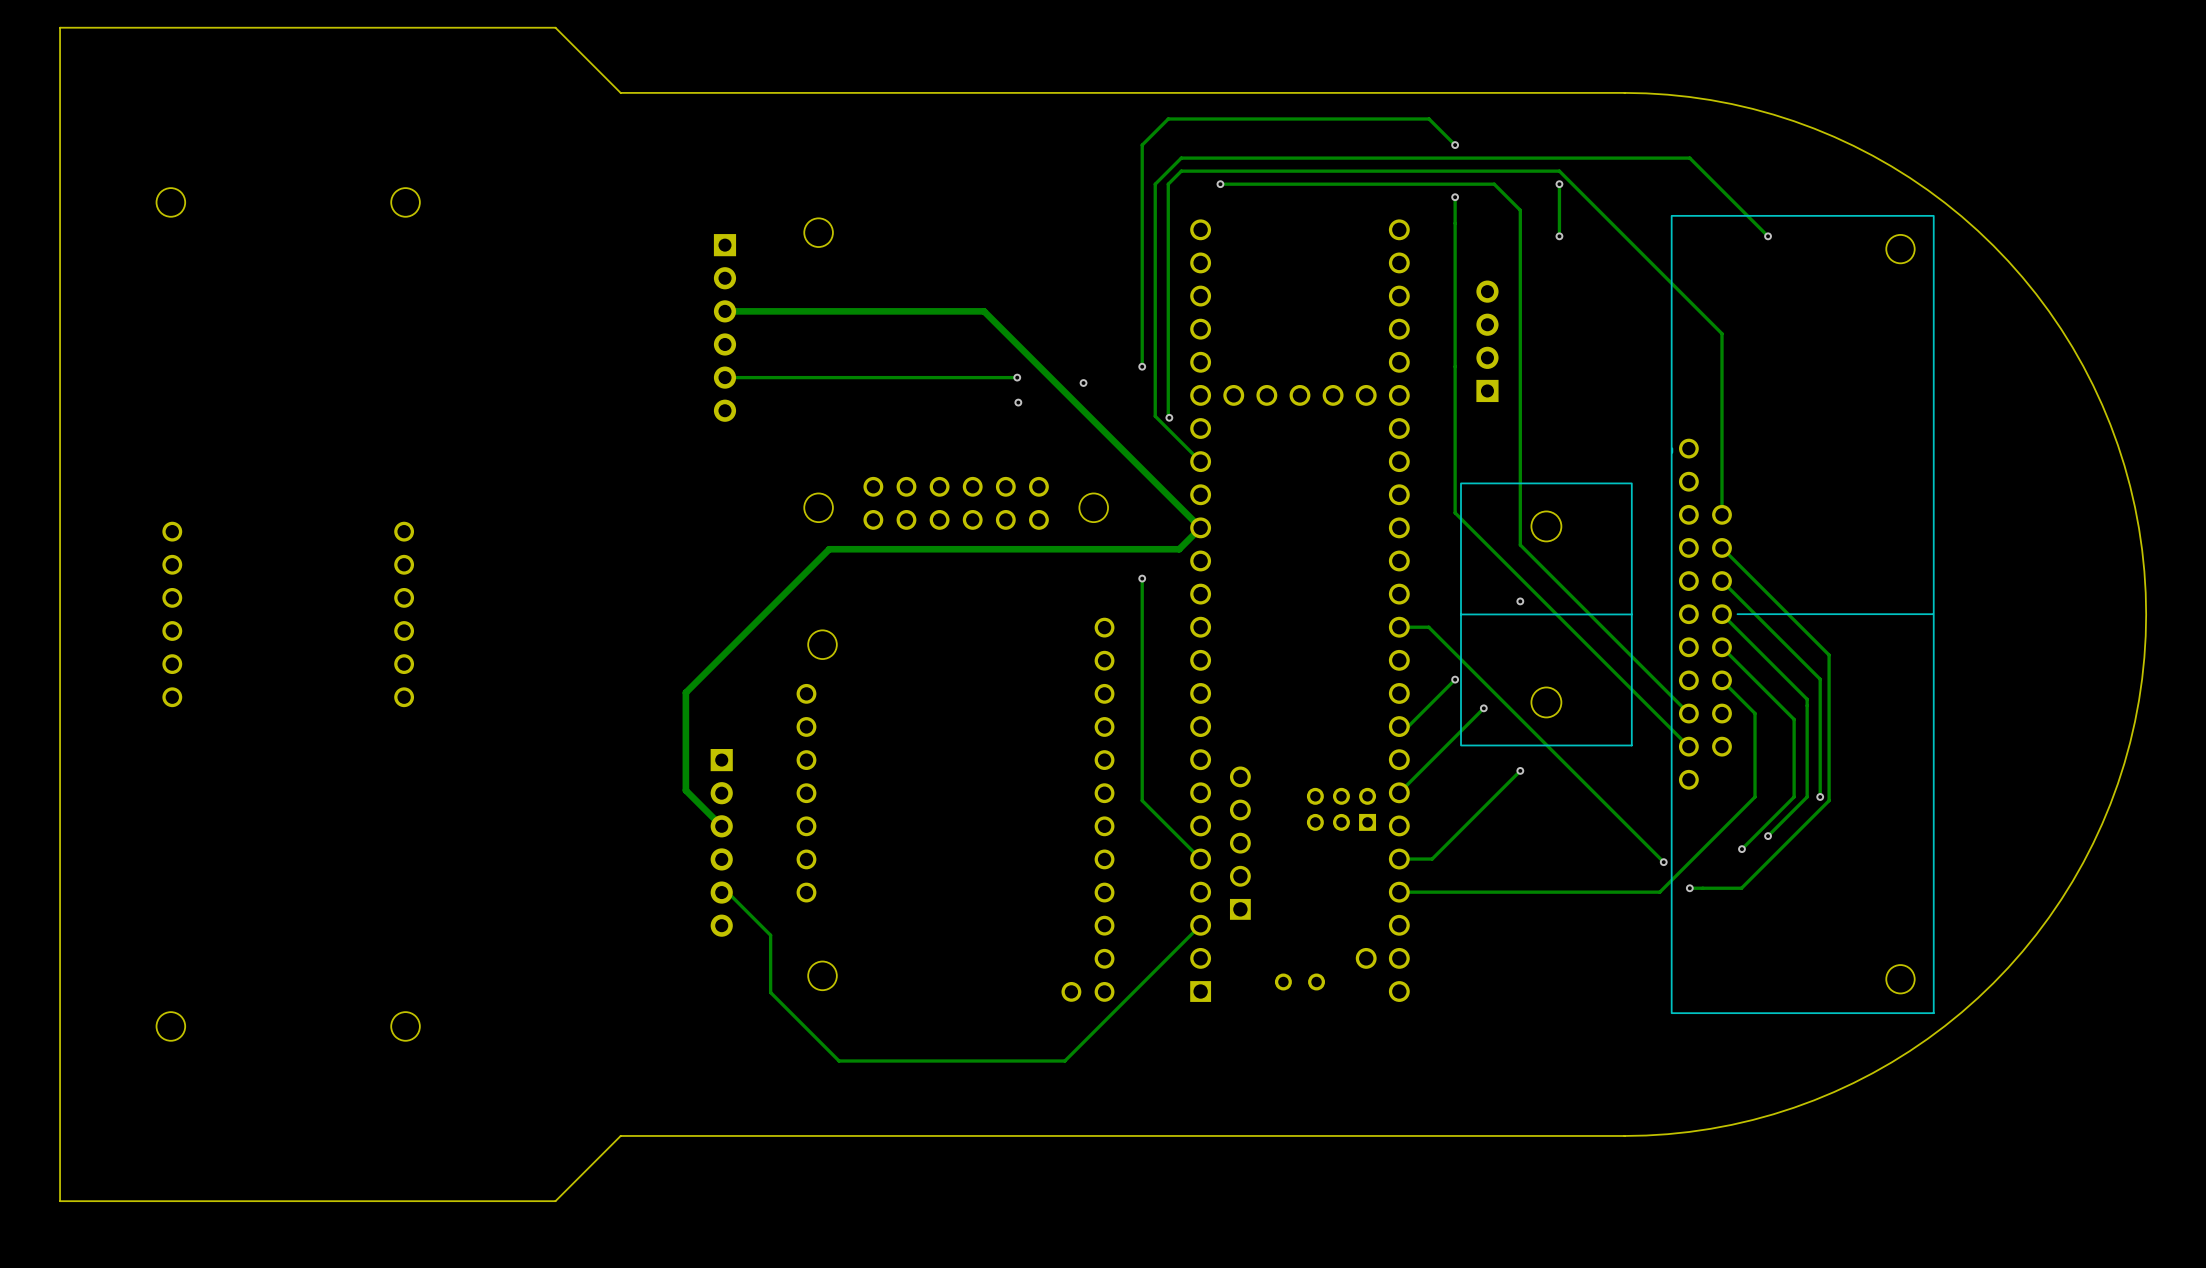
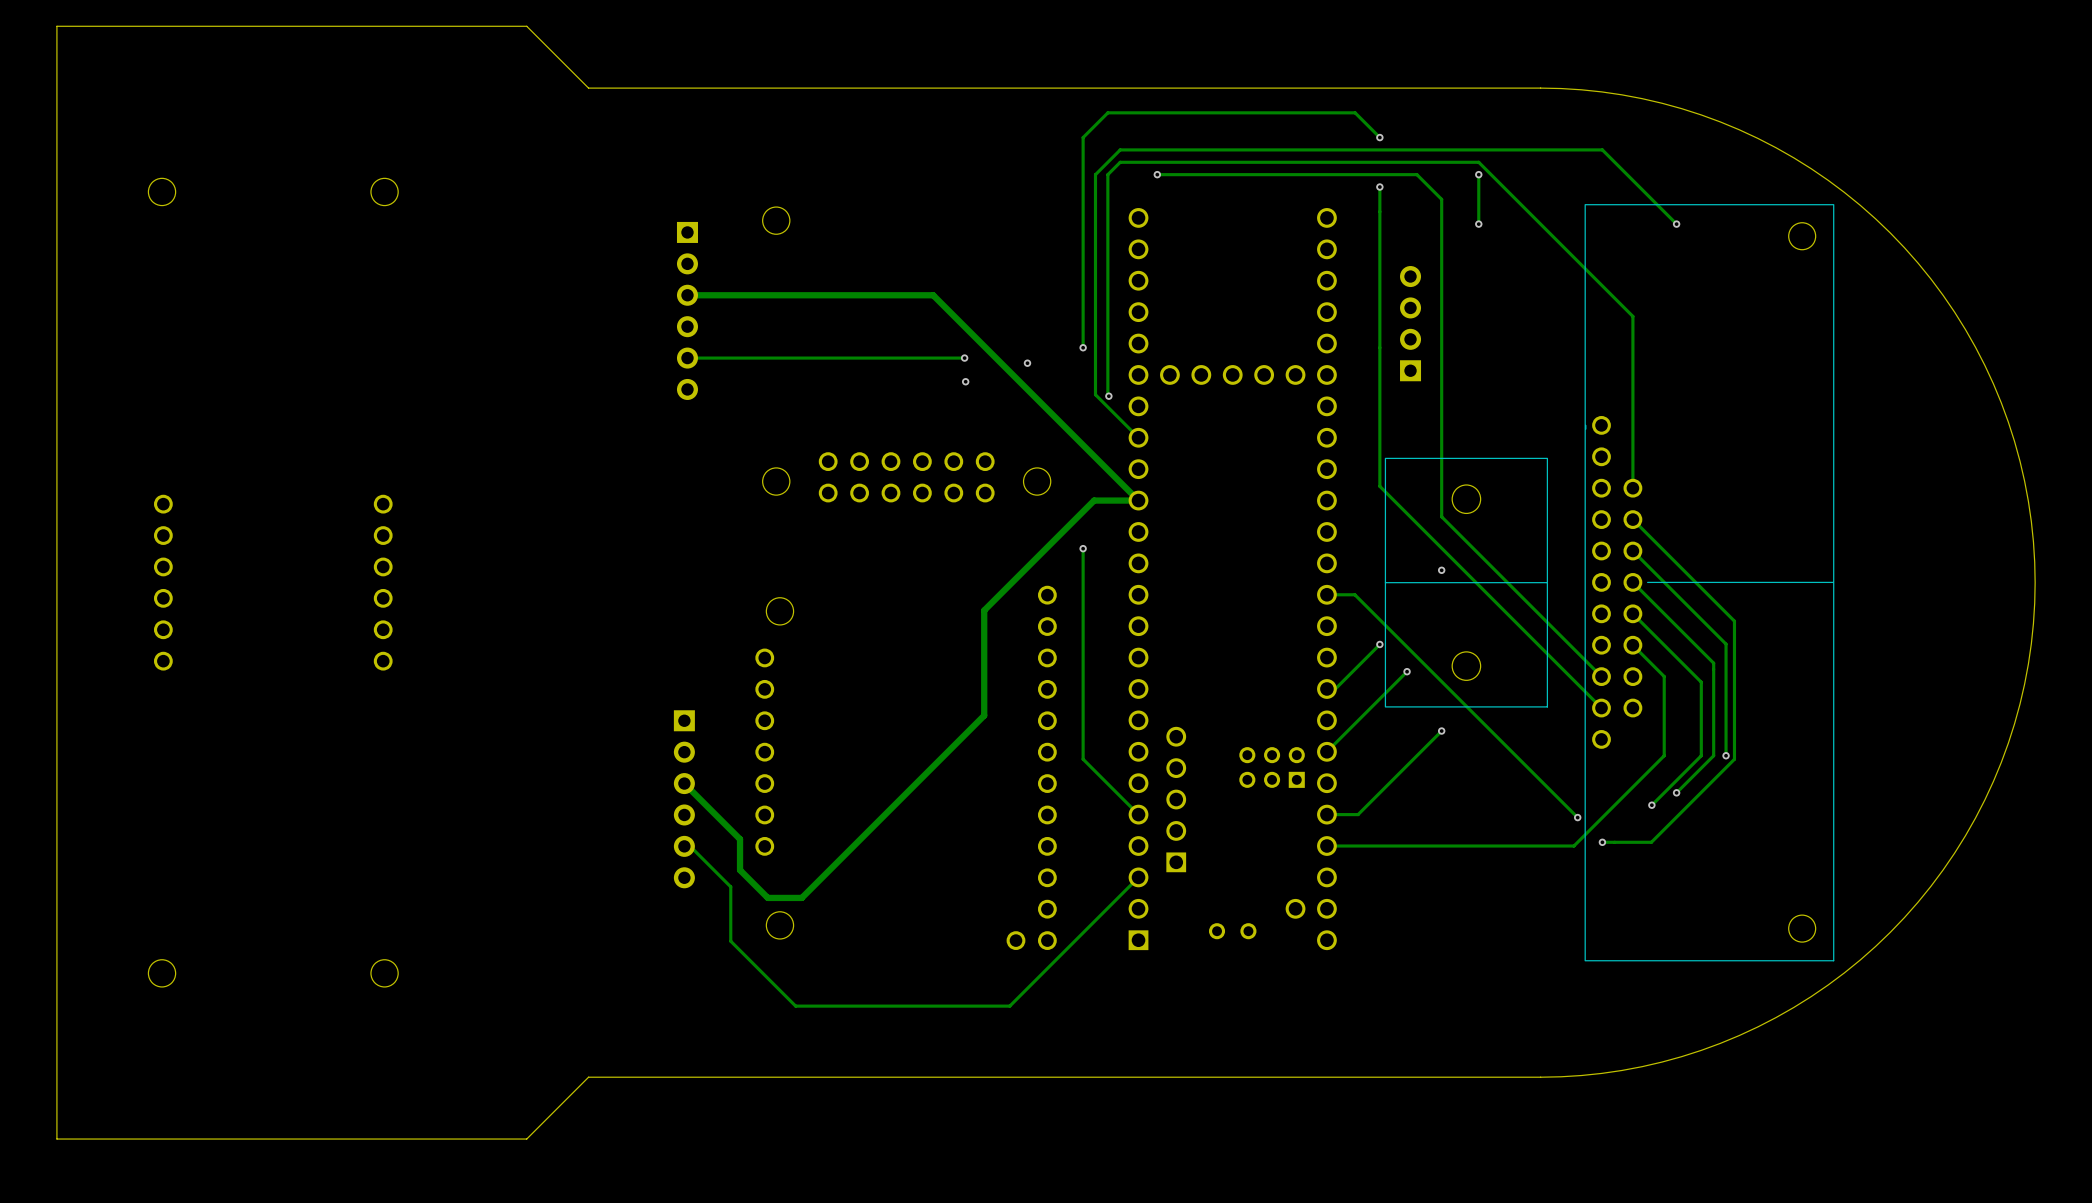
track: (1200, 527) (1179, 549) (829, 549) (685, 692) (685, 790) (721, 826) -> (1138, 500) (1094, 500) (984, 610) (984, 715) (801, 897) (767, 897) (740, 870) (740, 839) (684, 783)

